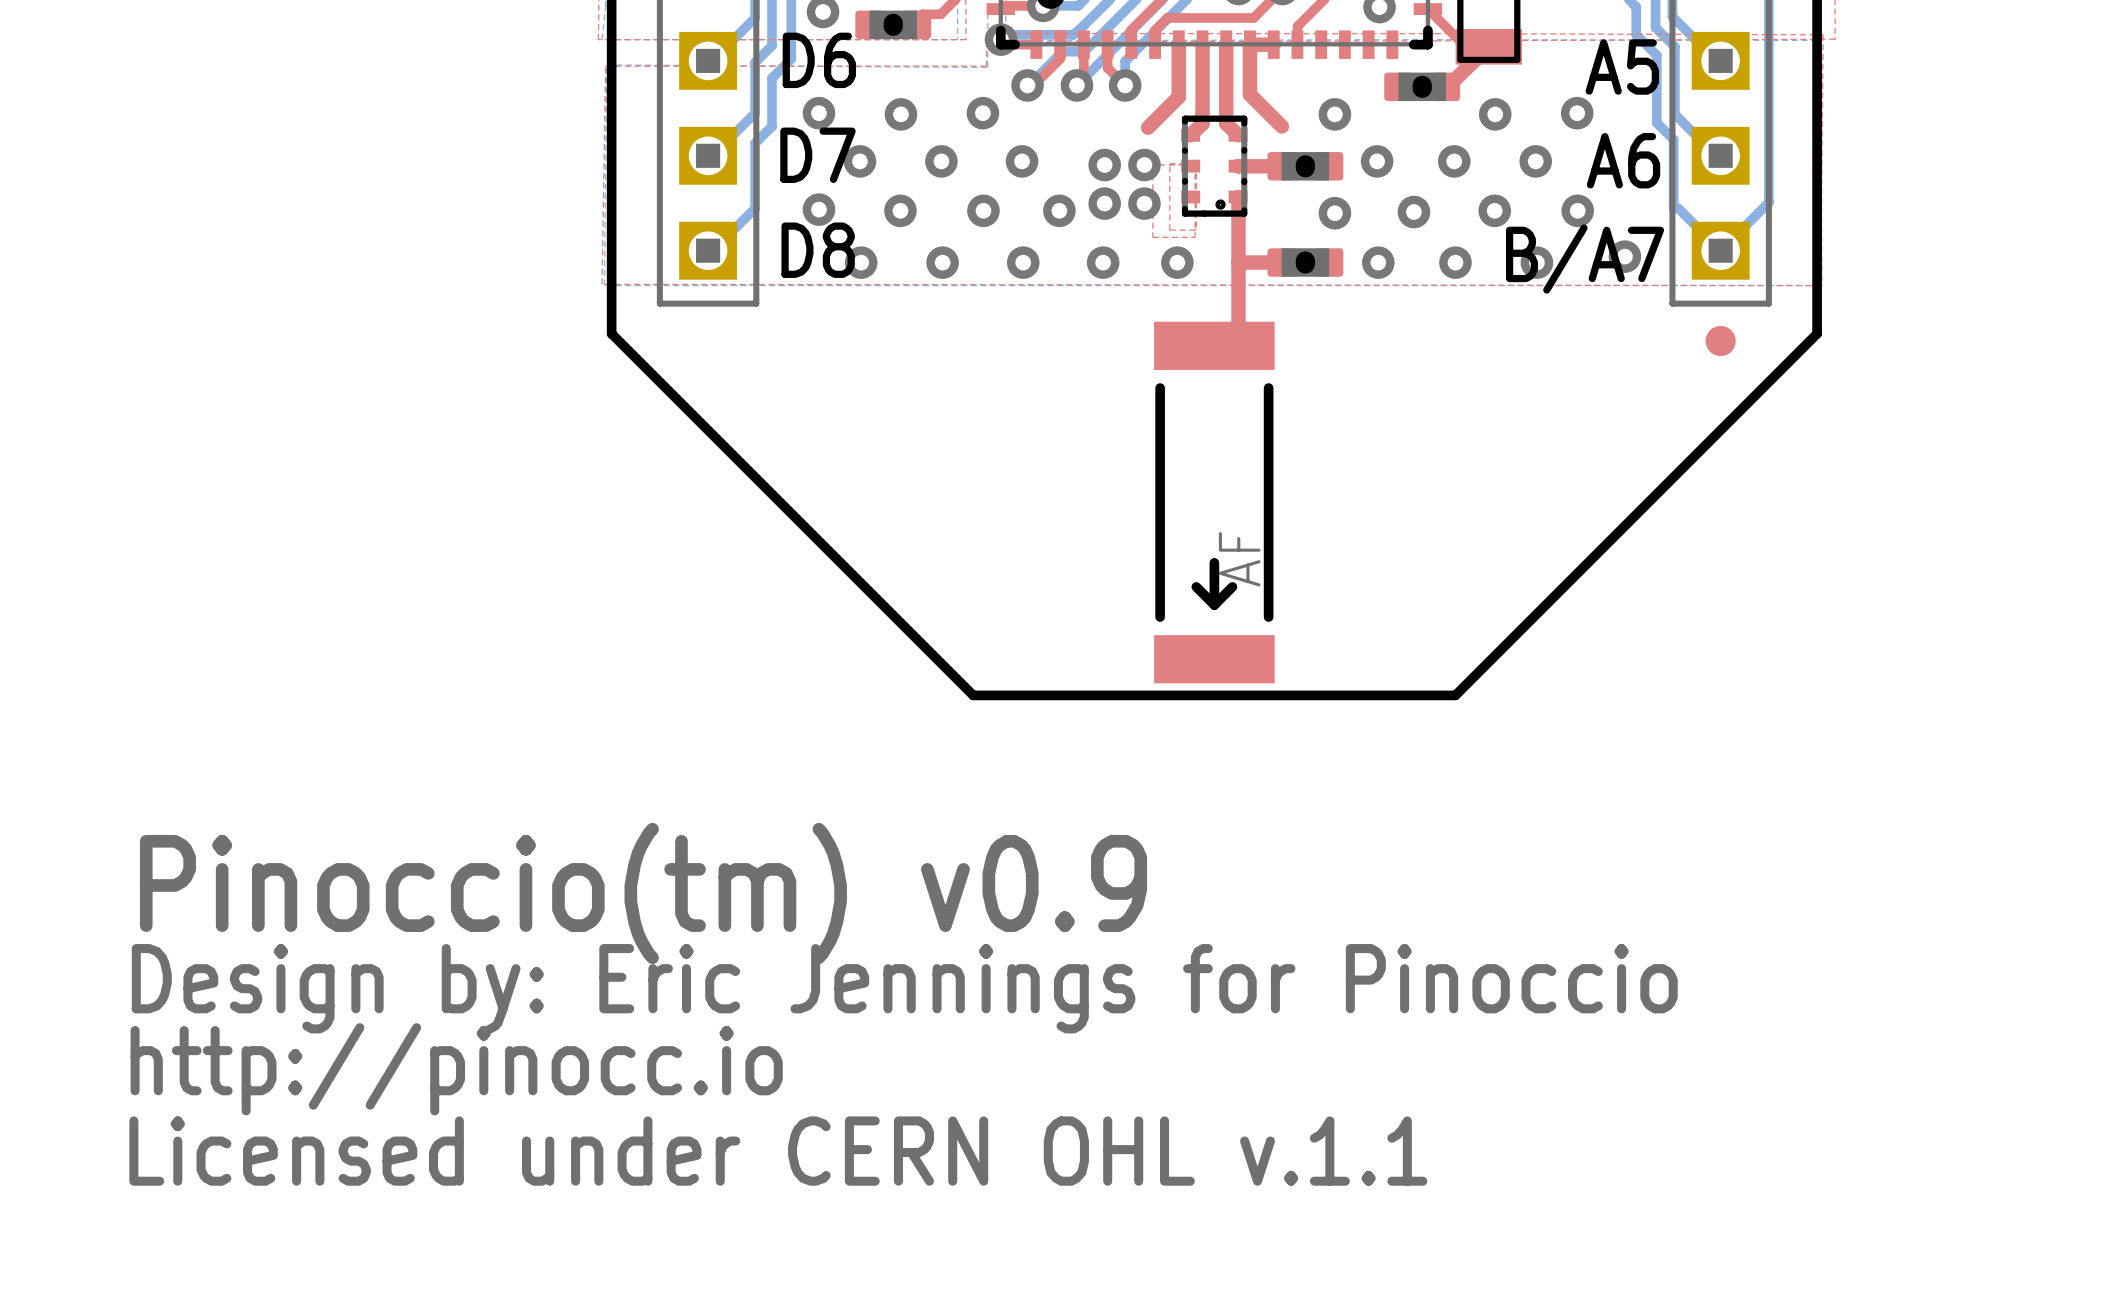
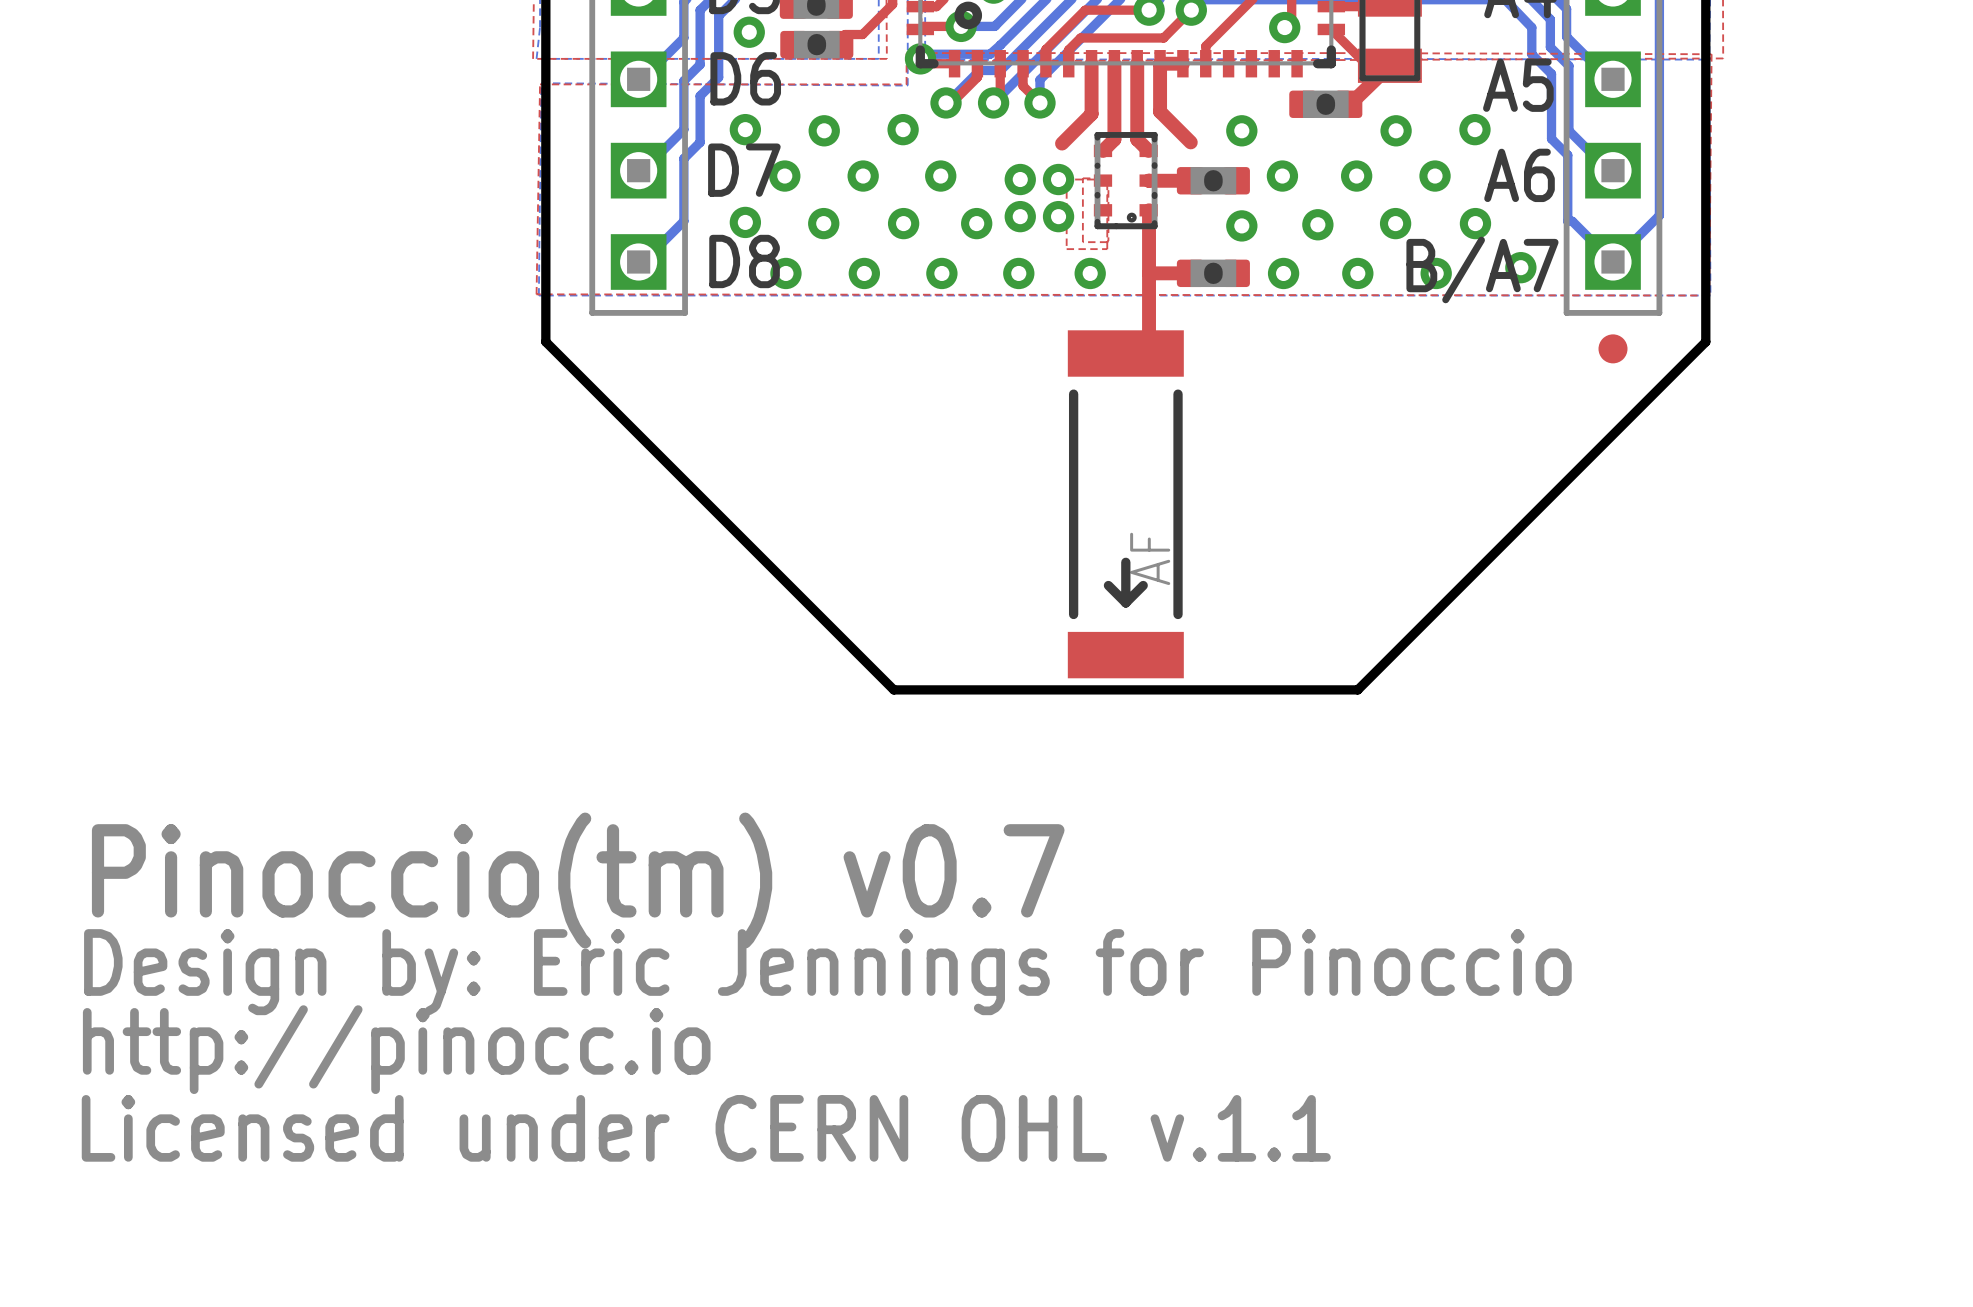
text: Pinoccio(tm) v0.9 (643, 893) -> Pinoccio(tm) v0.7 (578, 880)

